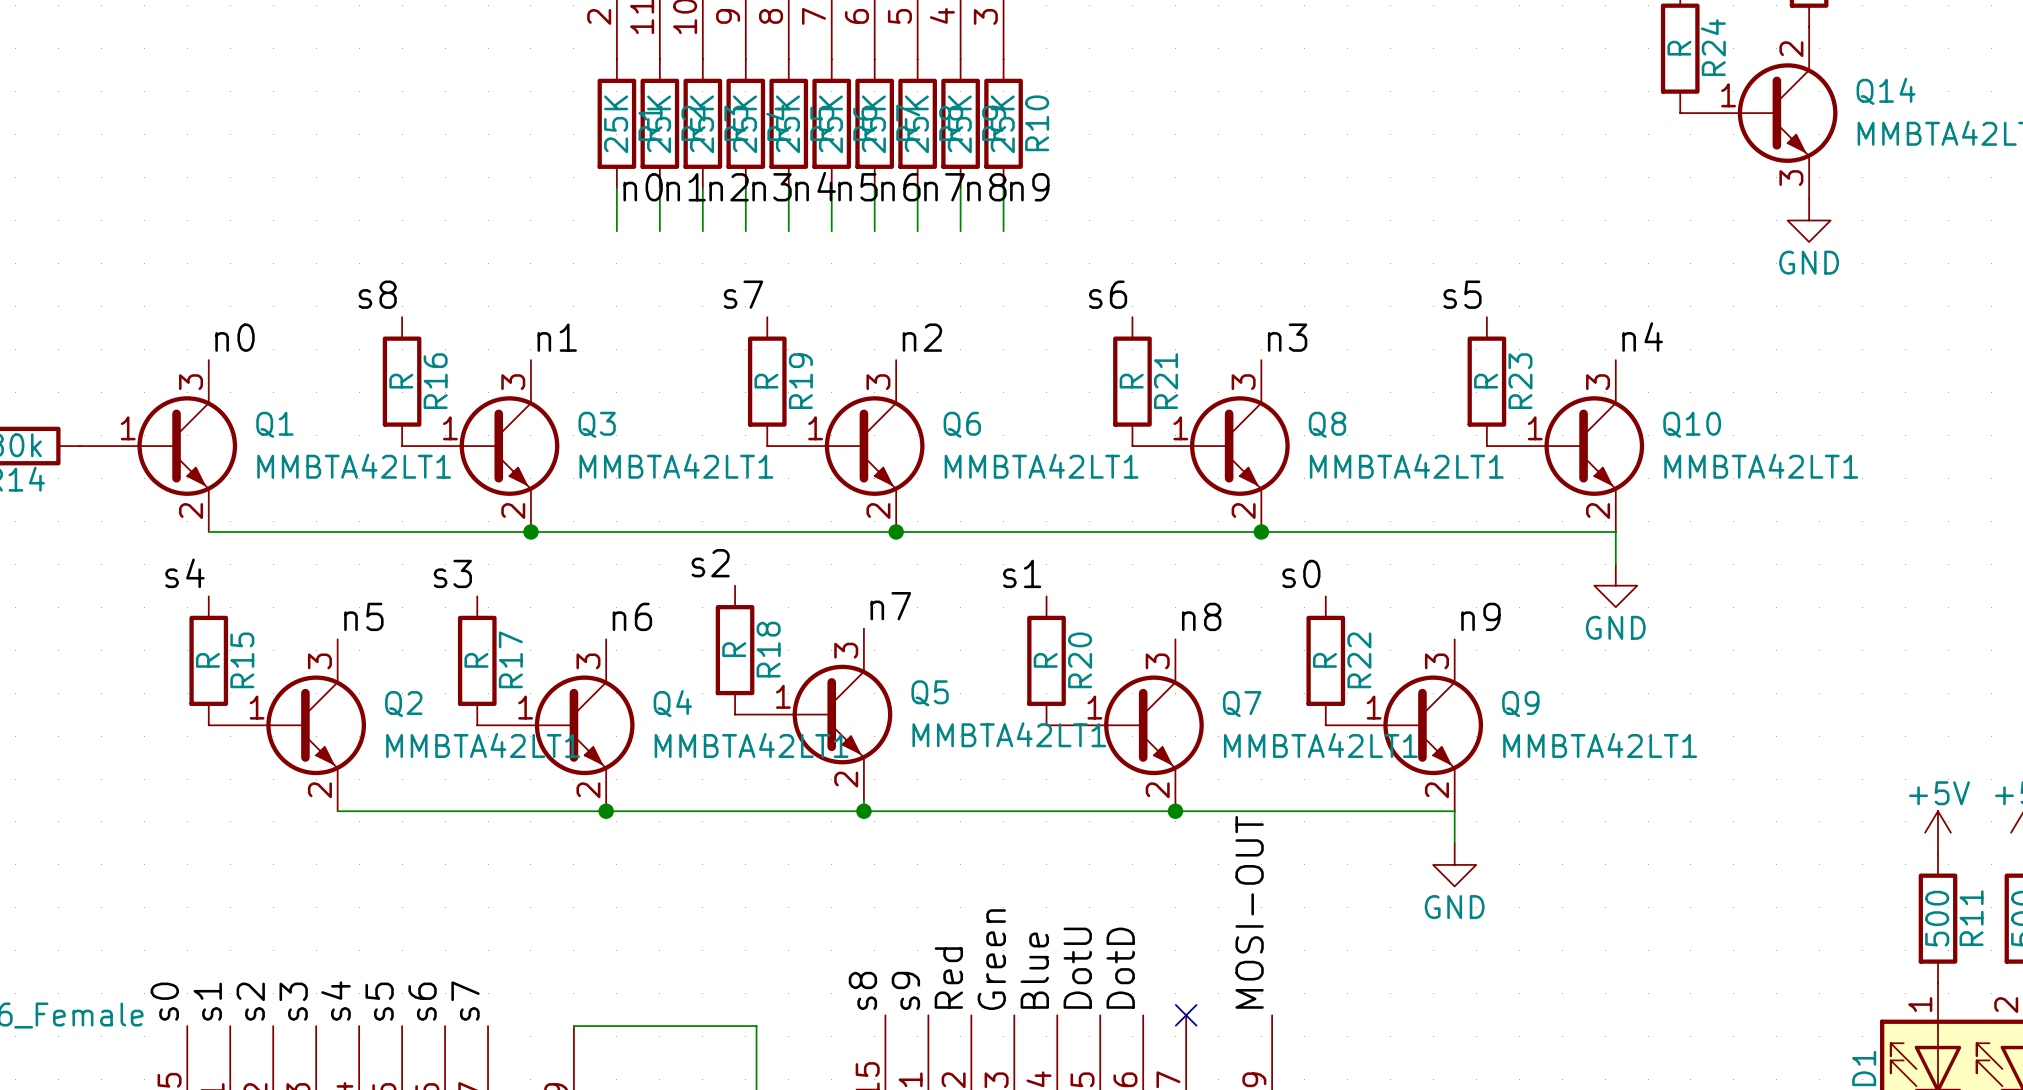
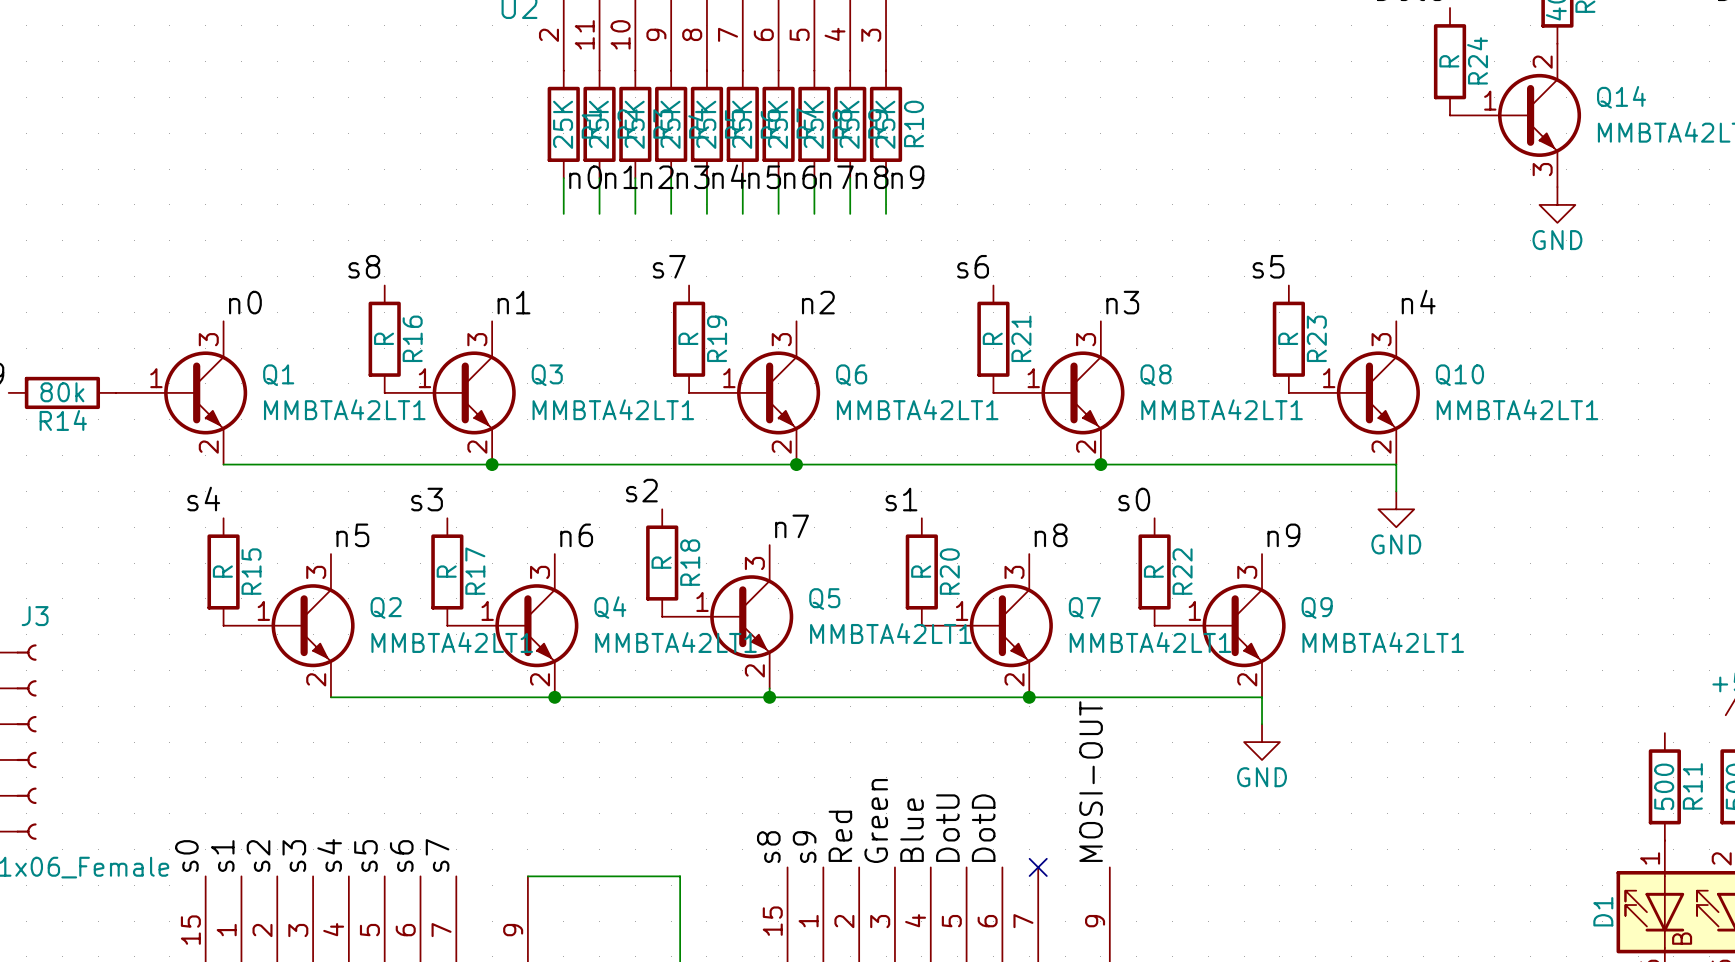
power symbol: +5V (1938, 832) -> none

